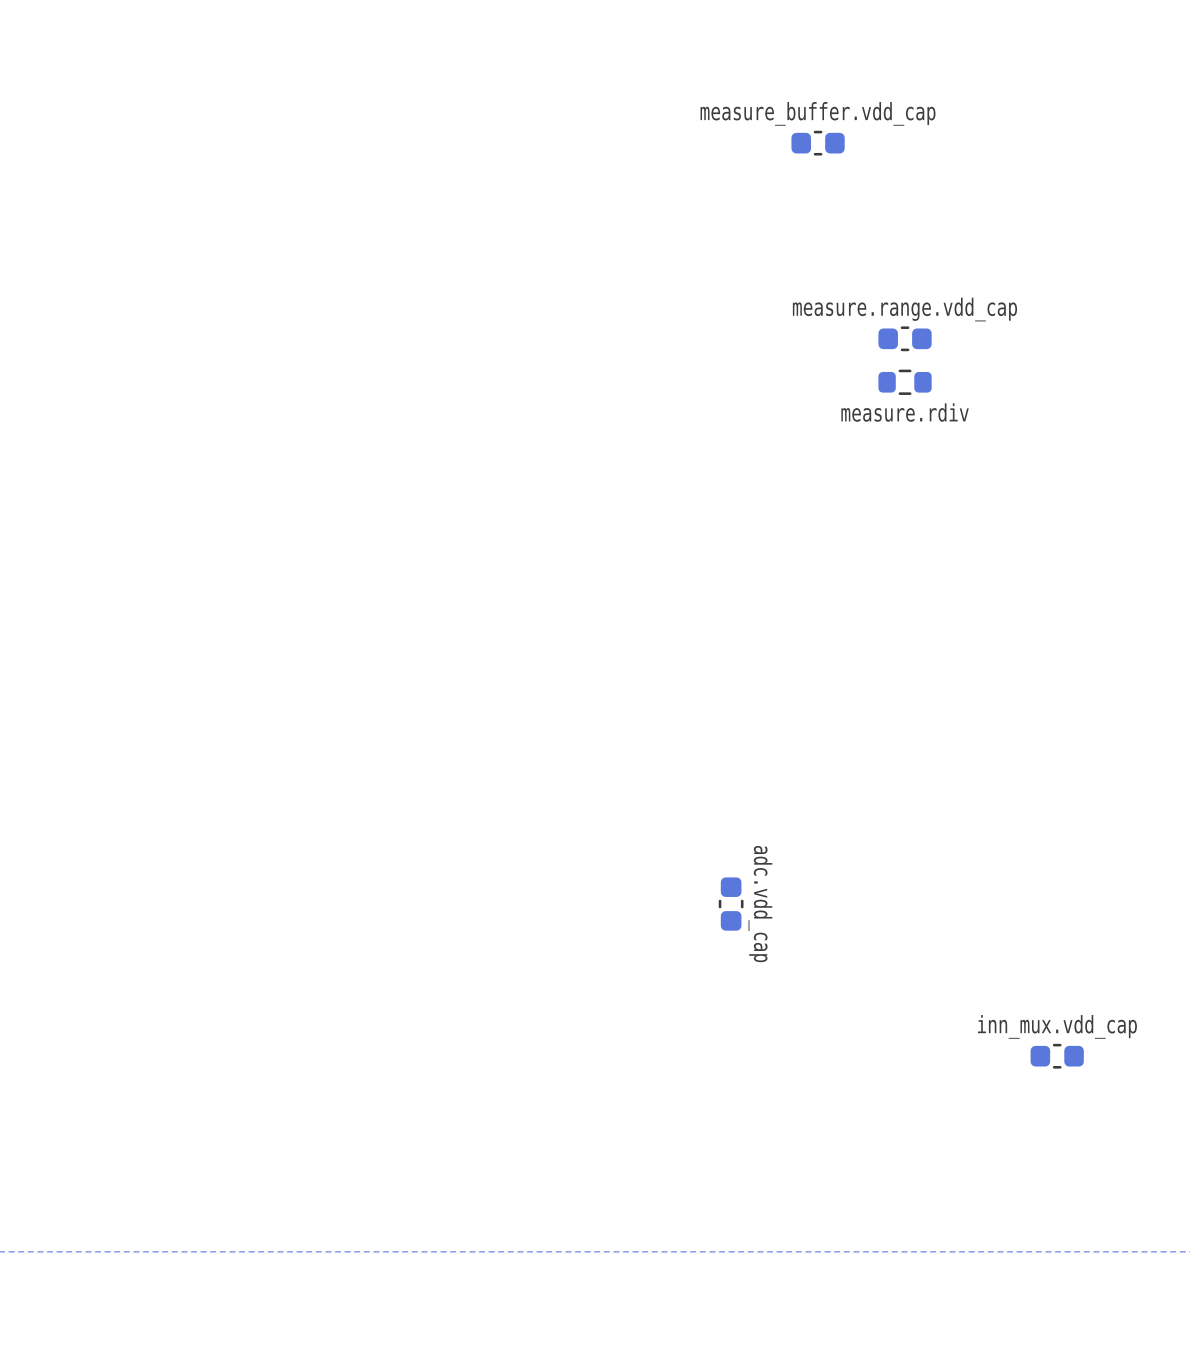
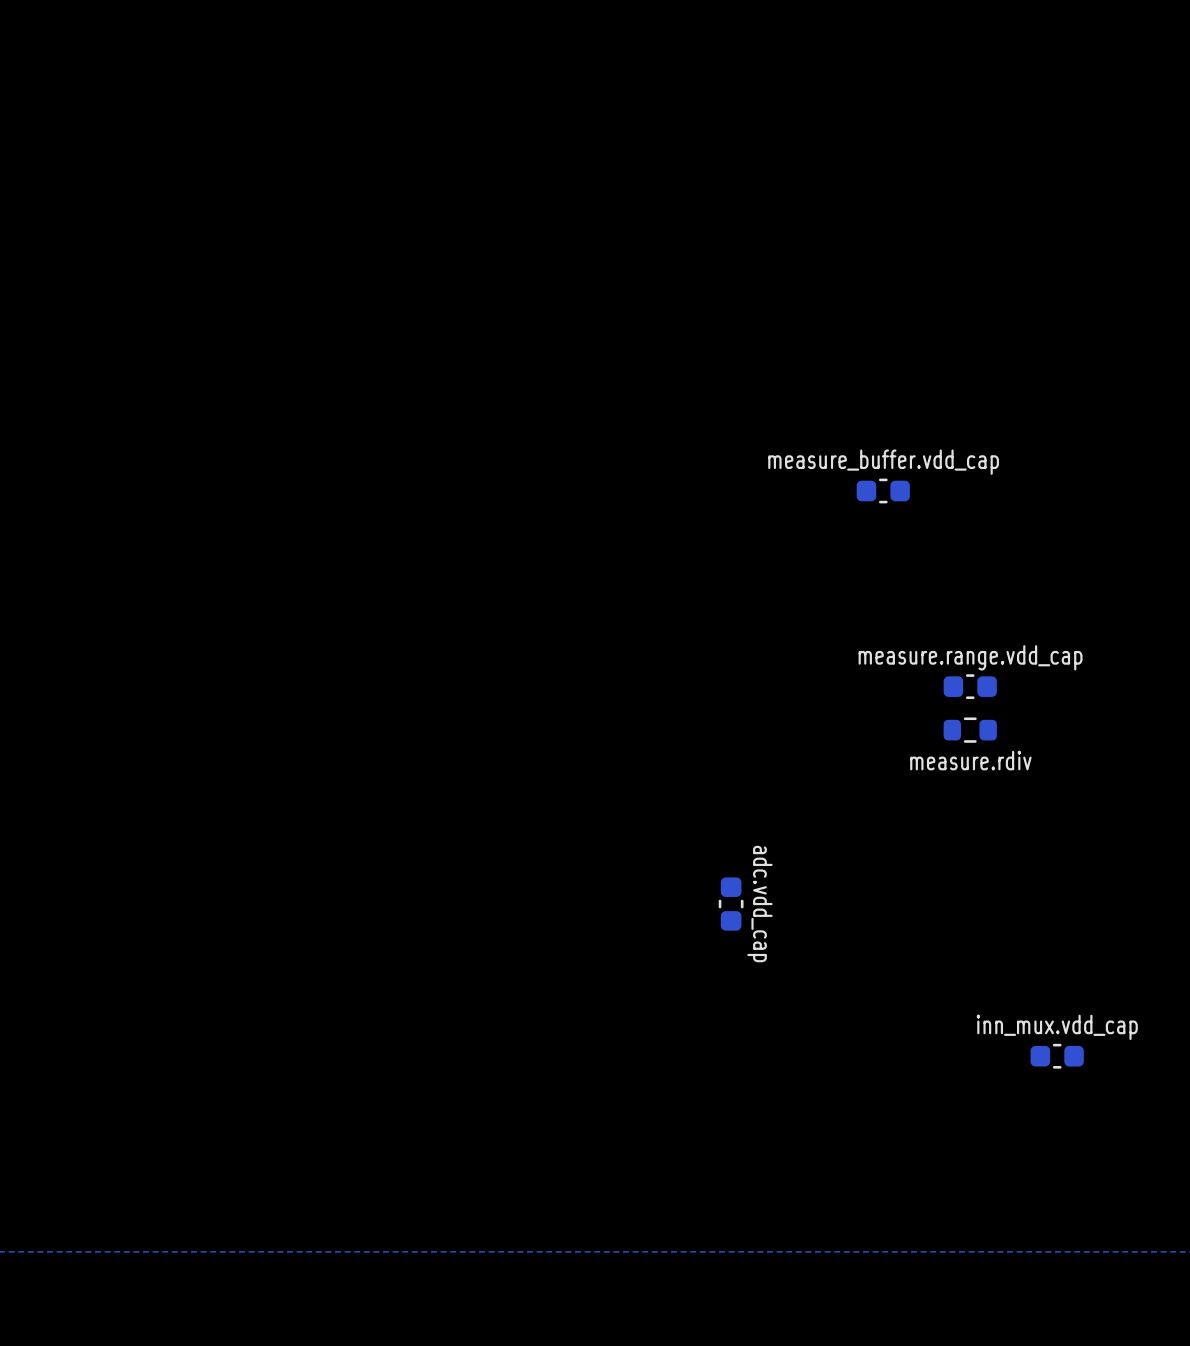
measure_buffer.vdd_cap position: (818, 143) -> (883, 490)
measure.range.vdd_cap position: (905, 338) -> (970, 686)
measure.rdiv position: (905, 382) -> (970, 730)

